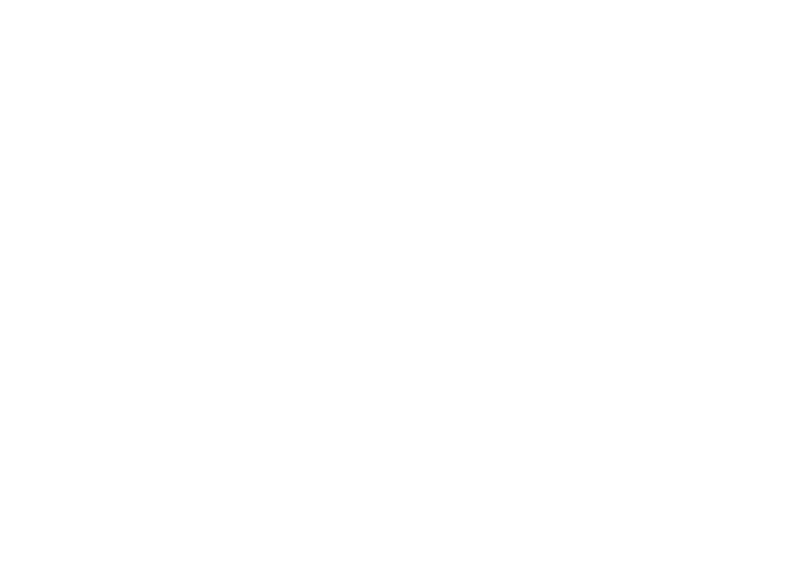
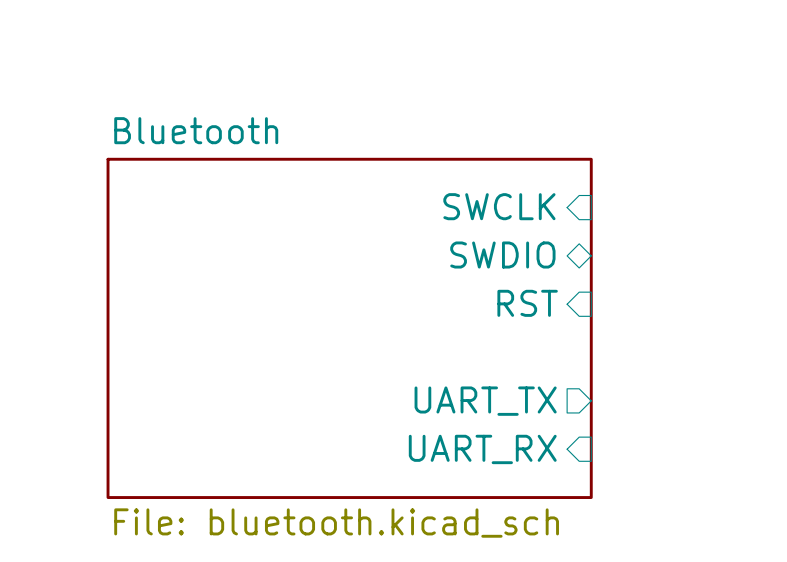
sheet pin: none -> SWCLK (499, 206)
sheet pin: none -> SWDIO (502, 255)
sheet pin: none -> RST (527, 303)
sheet Bluetooth: none -> File: bluetooth.kicad_sch (349, 328)
sheet pin: none -> UART_TX (485, 401)
sheet pin: none -> UART_RX (482, 449)

